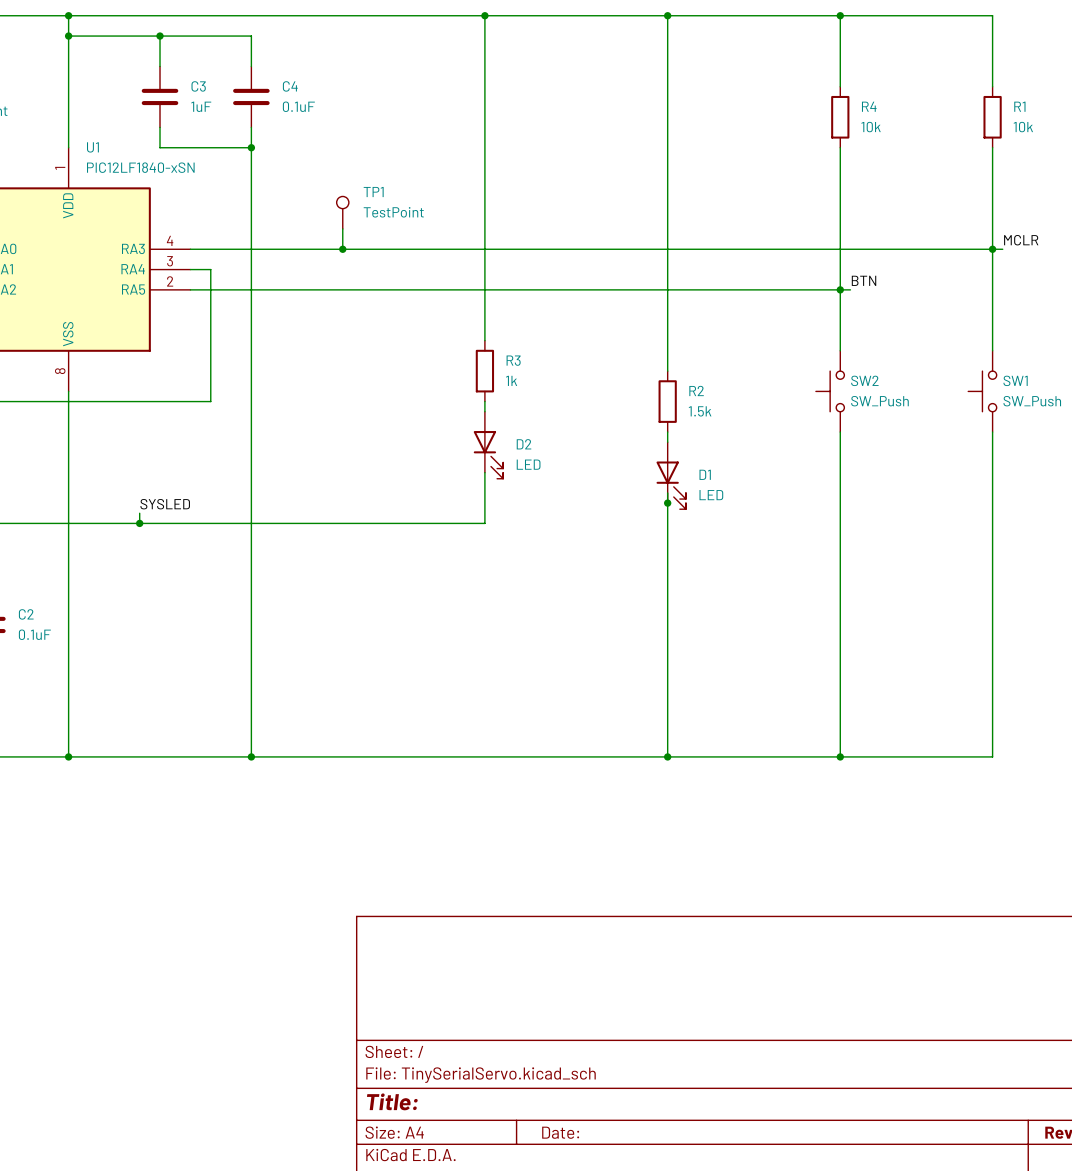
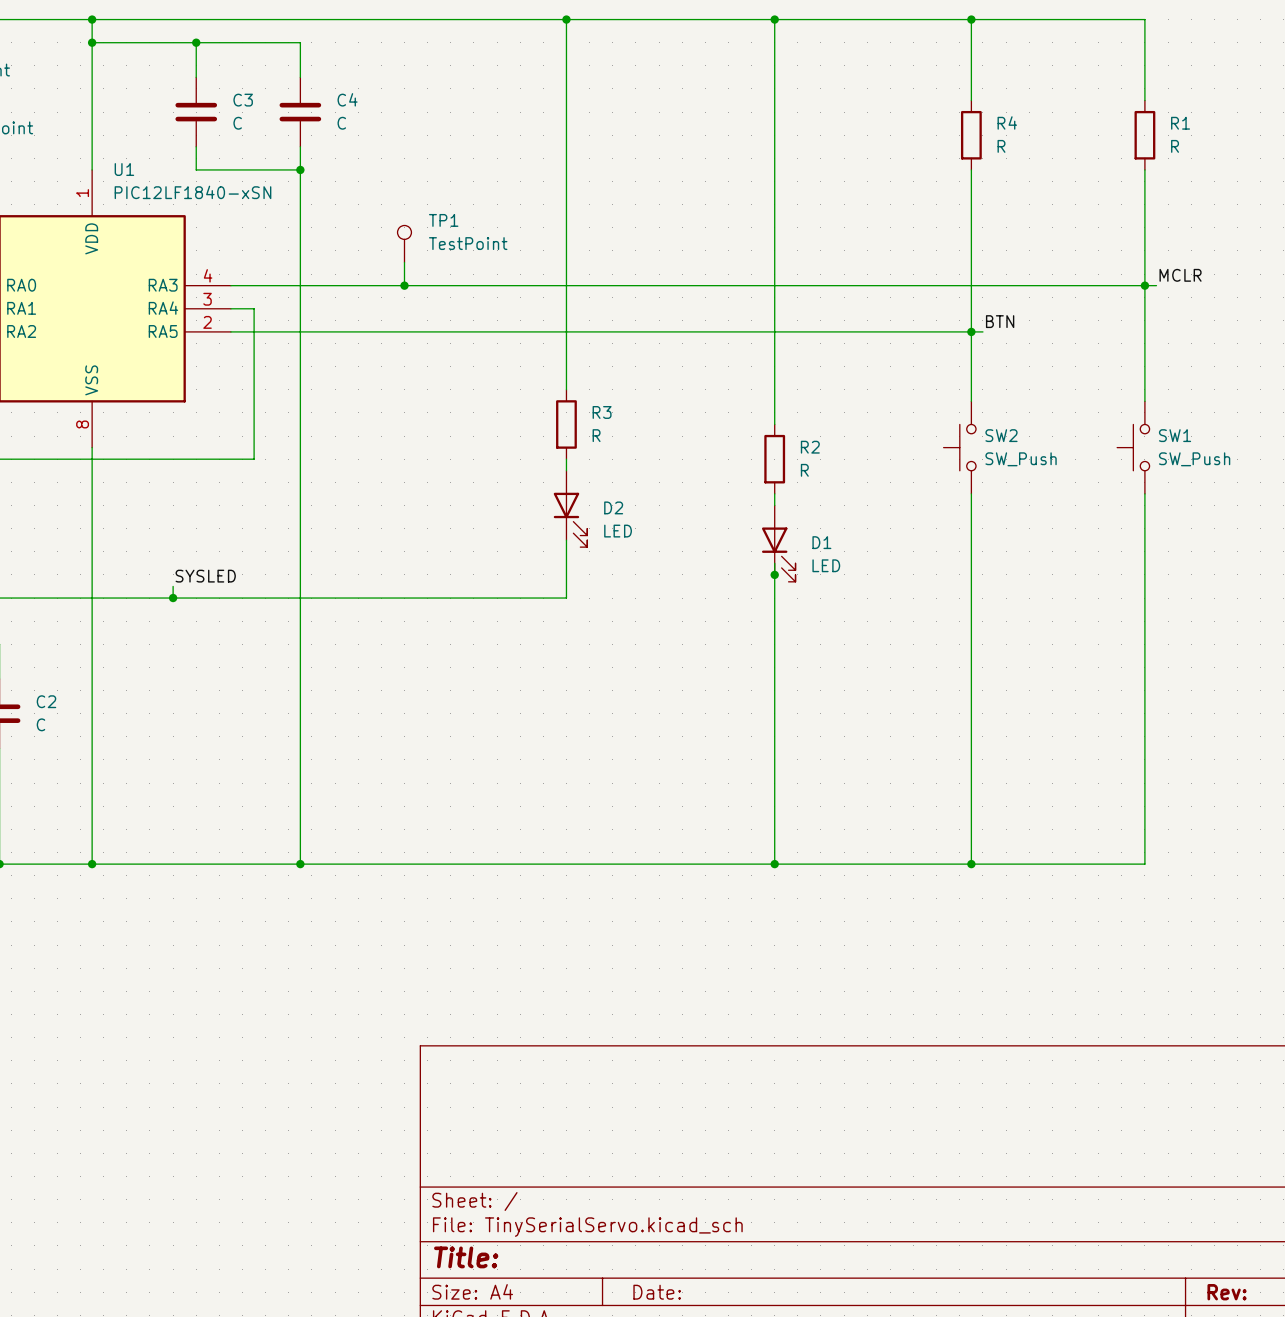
C3 value: 1uF (201, 106) -> C (237, 123)
C4 value: 0.1uF (298, 106) -> C (341, 123)
R4 value: 10k (871, 127) -> R (1001, 146)
R1 value: 10k (1023, 127) -> R (1175, 146)
R3 value: 1k (511, 380) -> R (596, 435)
R2 value: 1.5k (700, 411) -> R (804, 470)
C2 value: 0.1uF (34, 634) -> C (40, 724)

